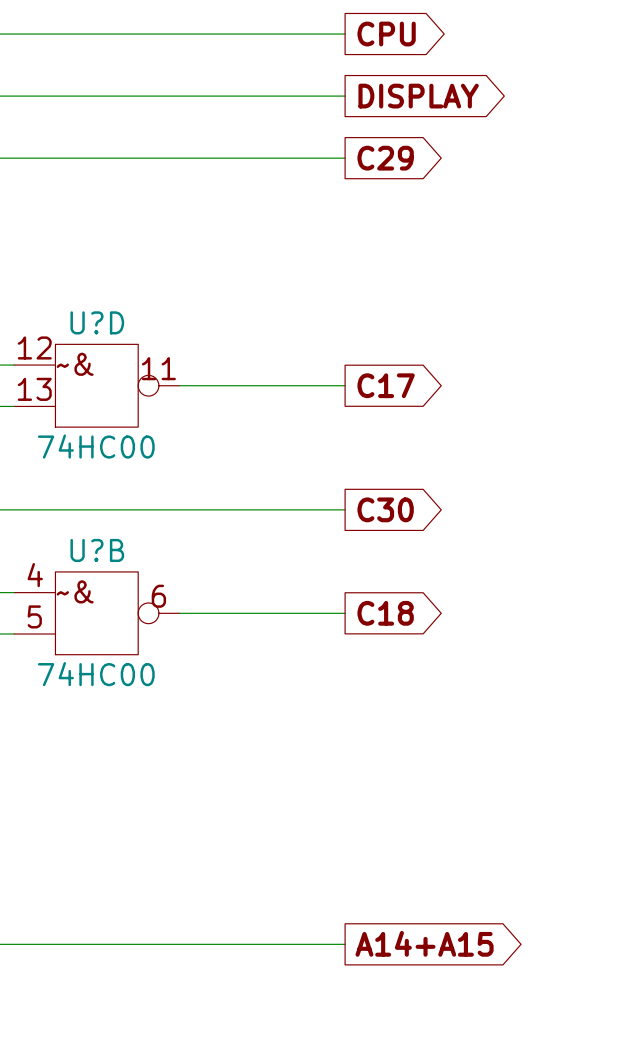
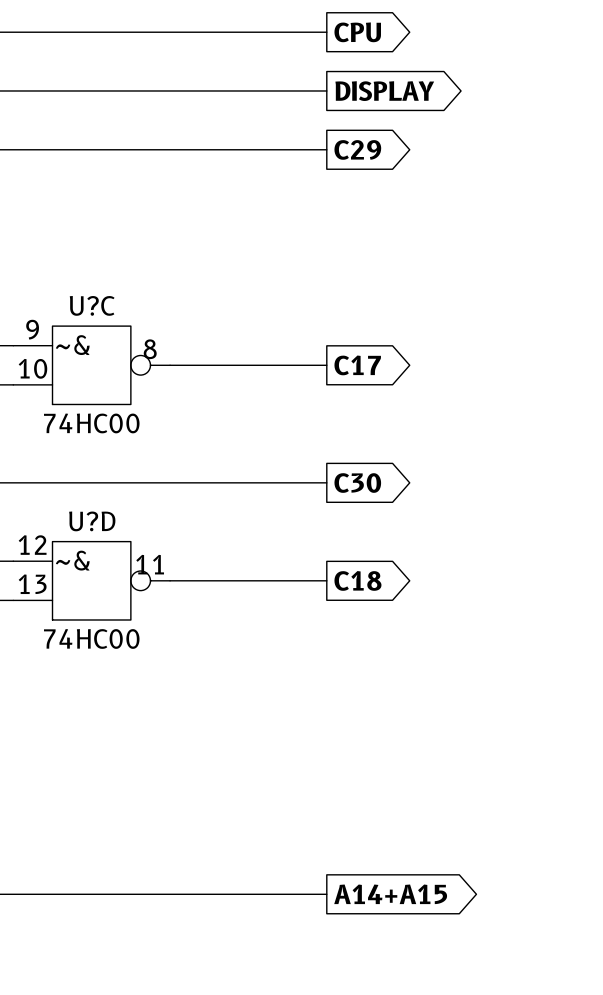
U?D name: U?D (97, 322) -> U?C (92, 305)
U?D pin number: 12 (34, 347) -> 9 (32, 329)
U?D pin number: 11 (158, 368) -> 8 (150, 349)
U?D pin number: 13 (34, 389) -> 10 (32, 368)
U?B name: U?B (97, 550) -> U?D (92, 521)
U?B pin number: 4 (35, 575) -> 12 (32, 545)
U?B pin number: 6 (158, 596) -> 11 (150, 564)
U?B pin number: 5 (34, 616) -> 13 (32, 584)

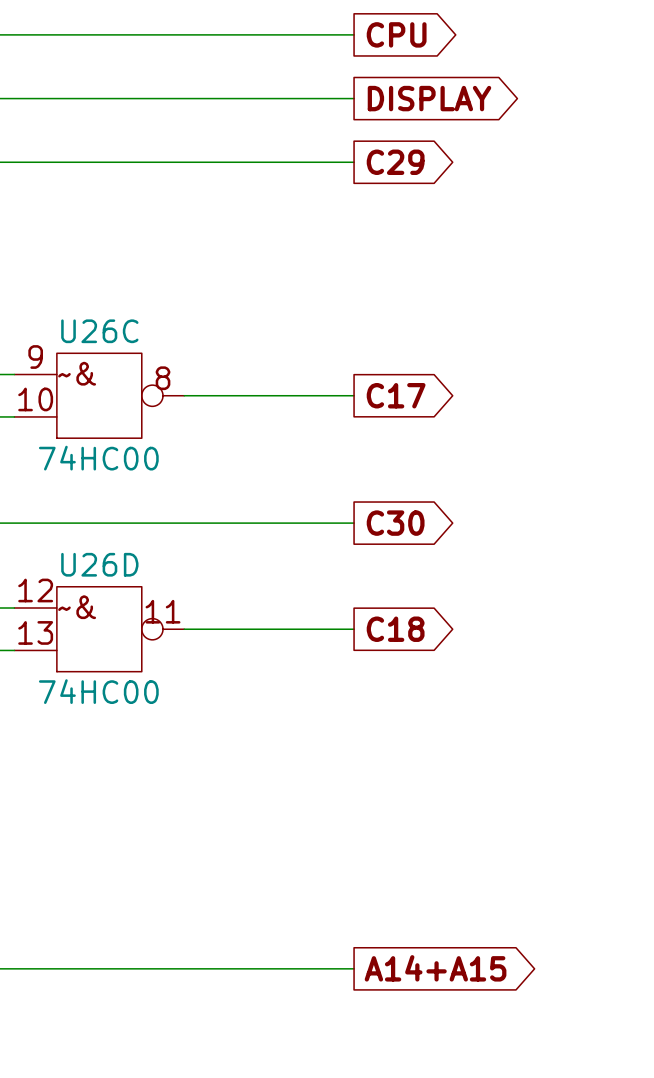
U?C name: U?C (92, 305) -> U26C (99, 331)
U?D name: U?D (92, 521) -> U26D (99, 564)

